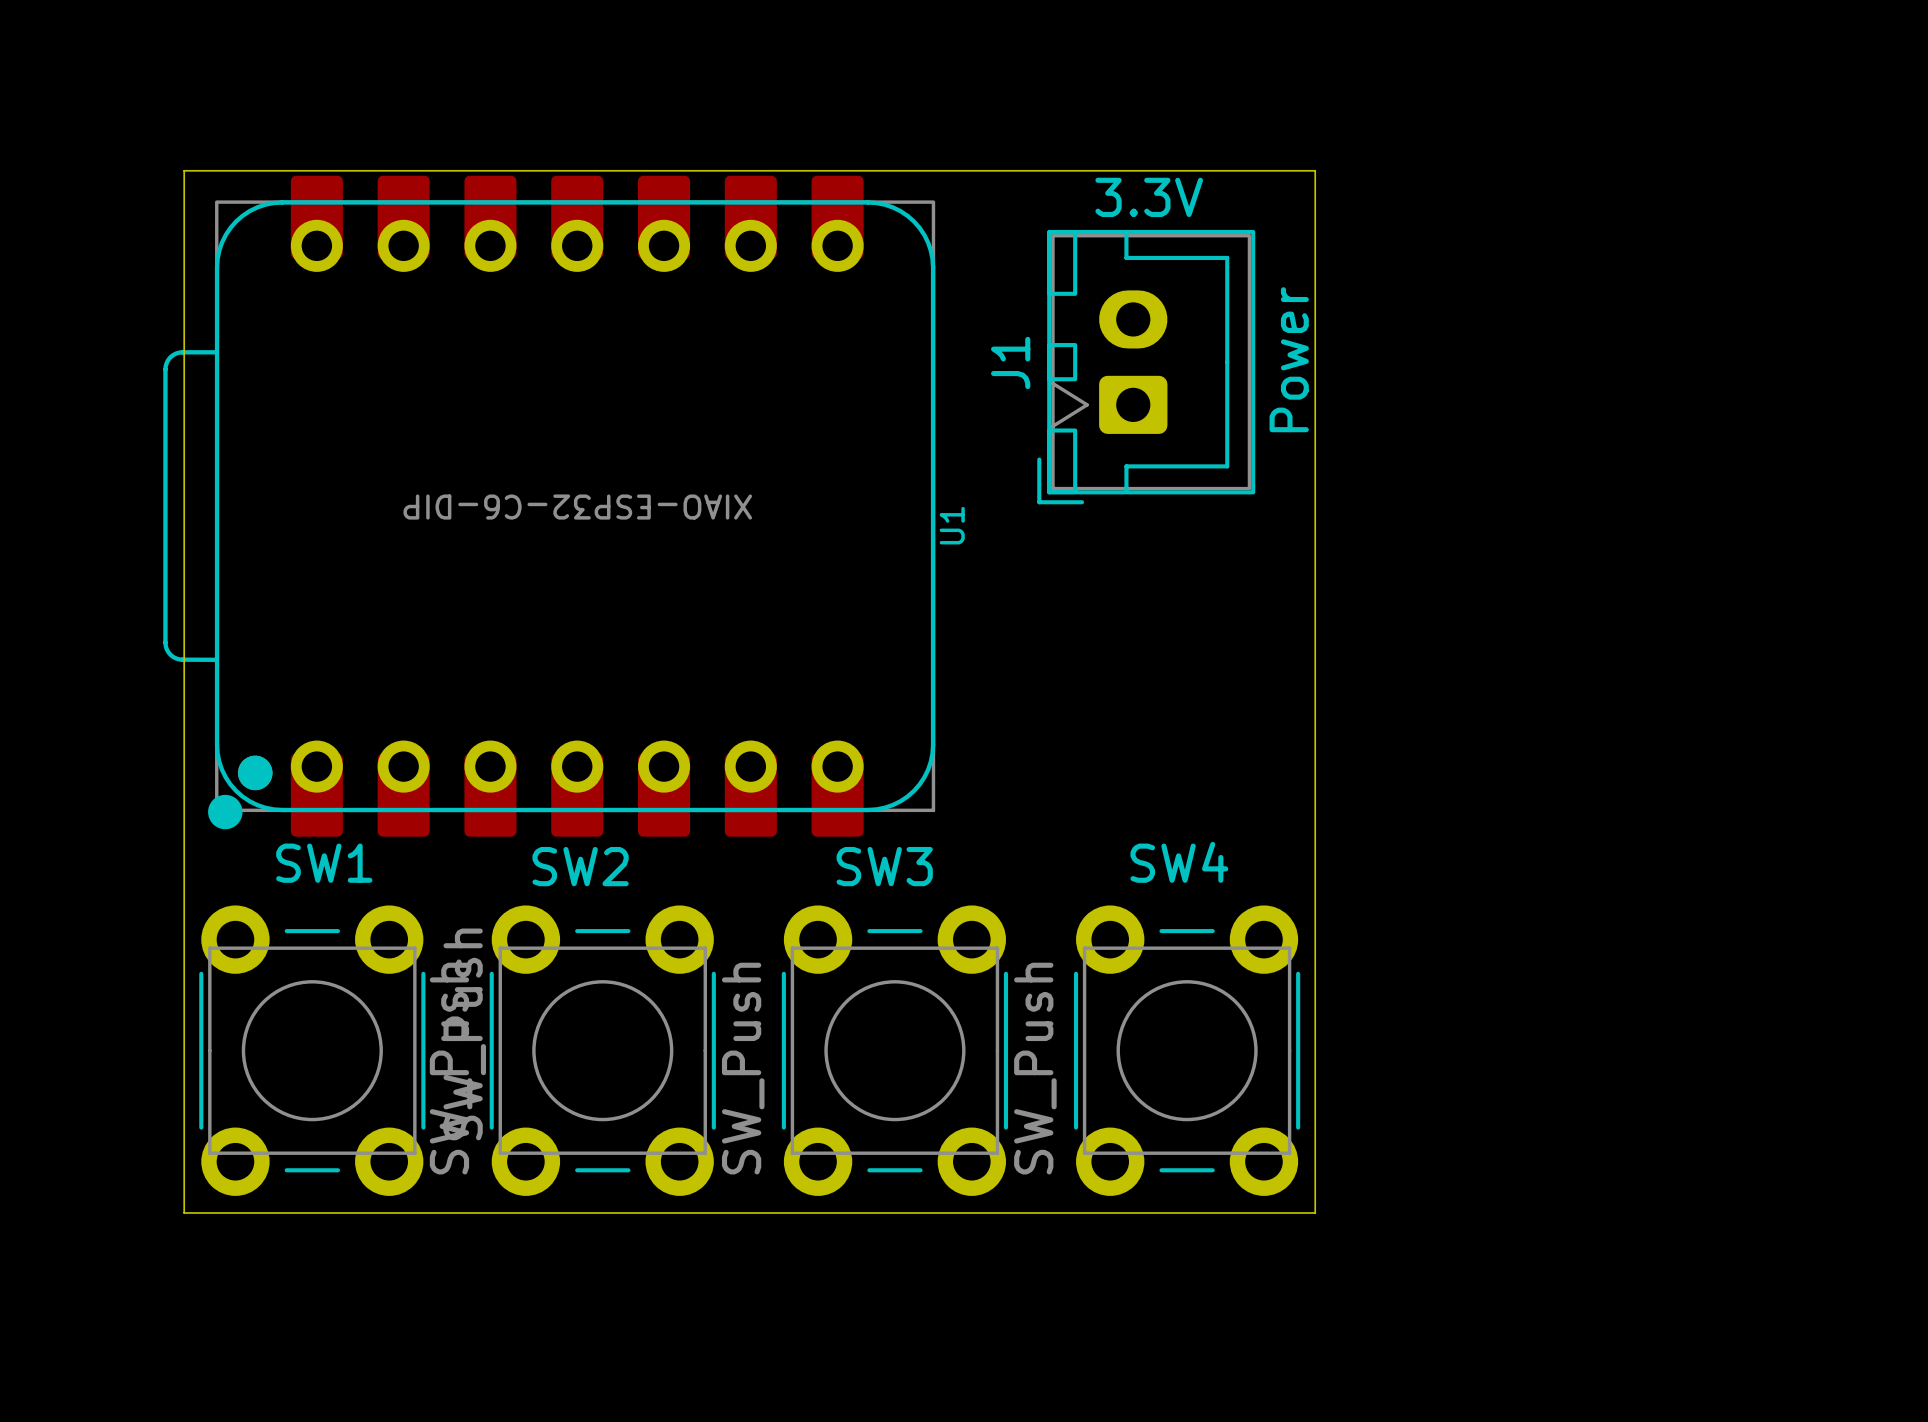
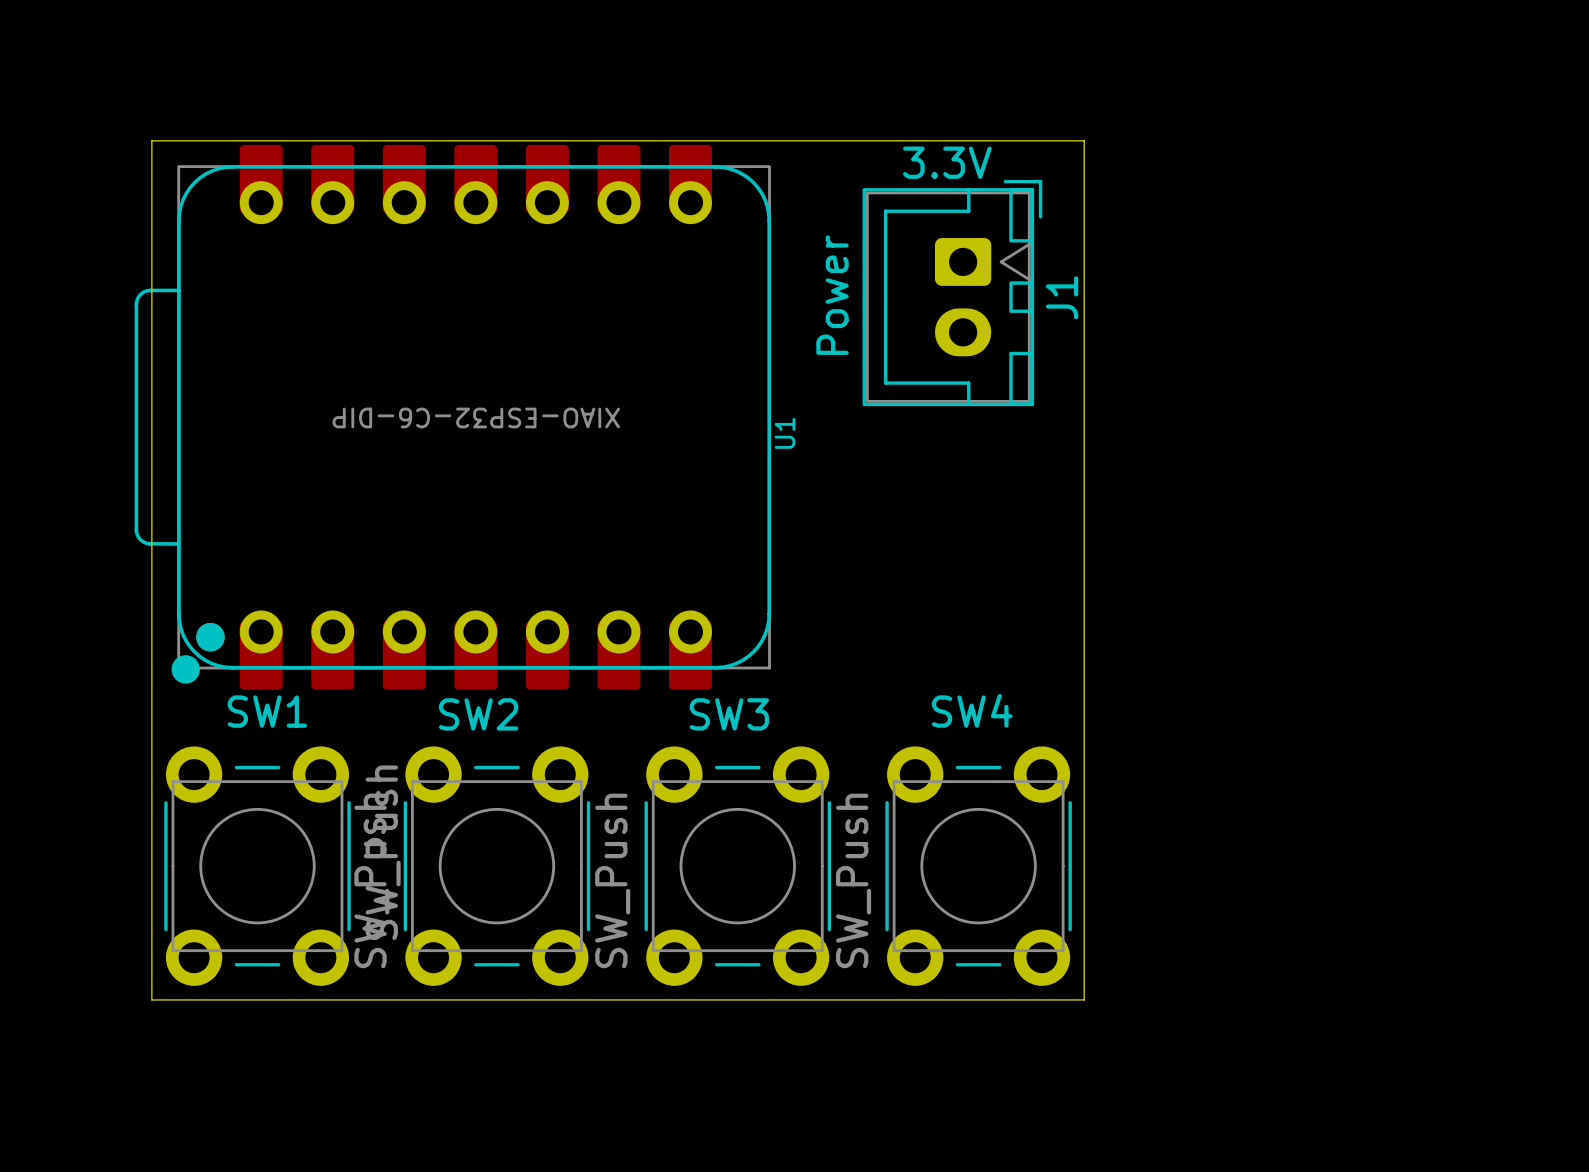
J1 rotation: 0° (1146, 367) -> 180° (952, 293)

